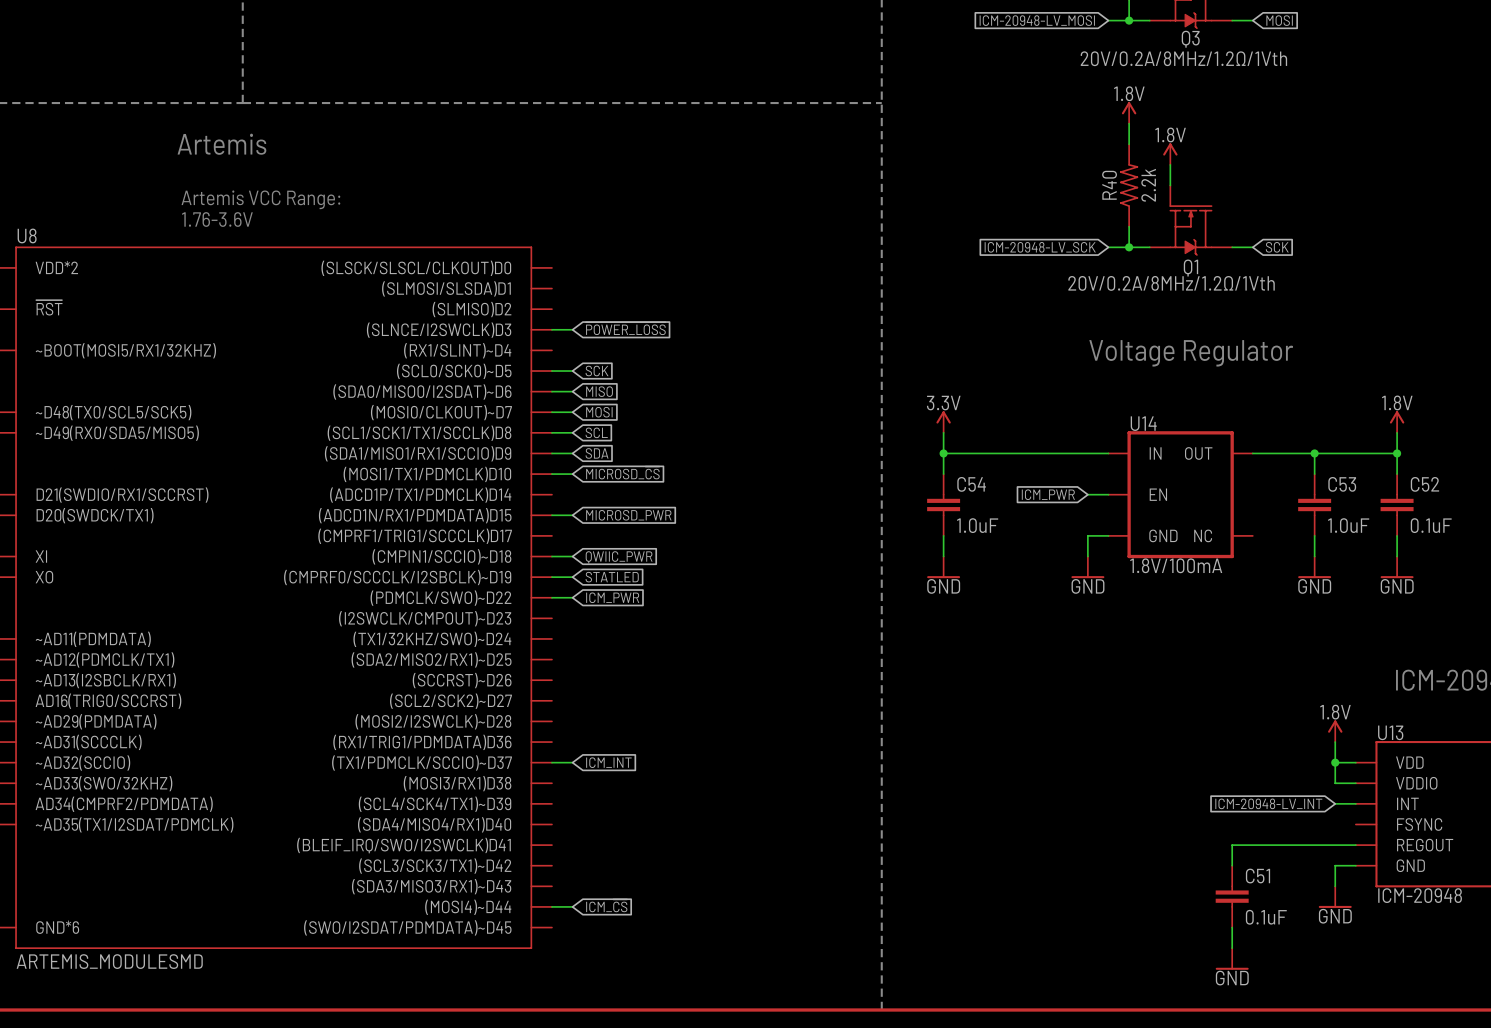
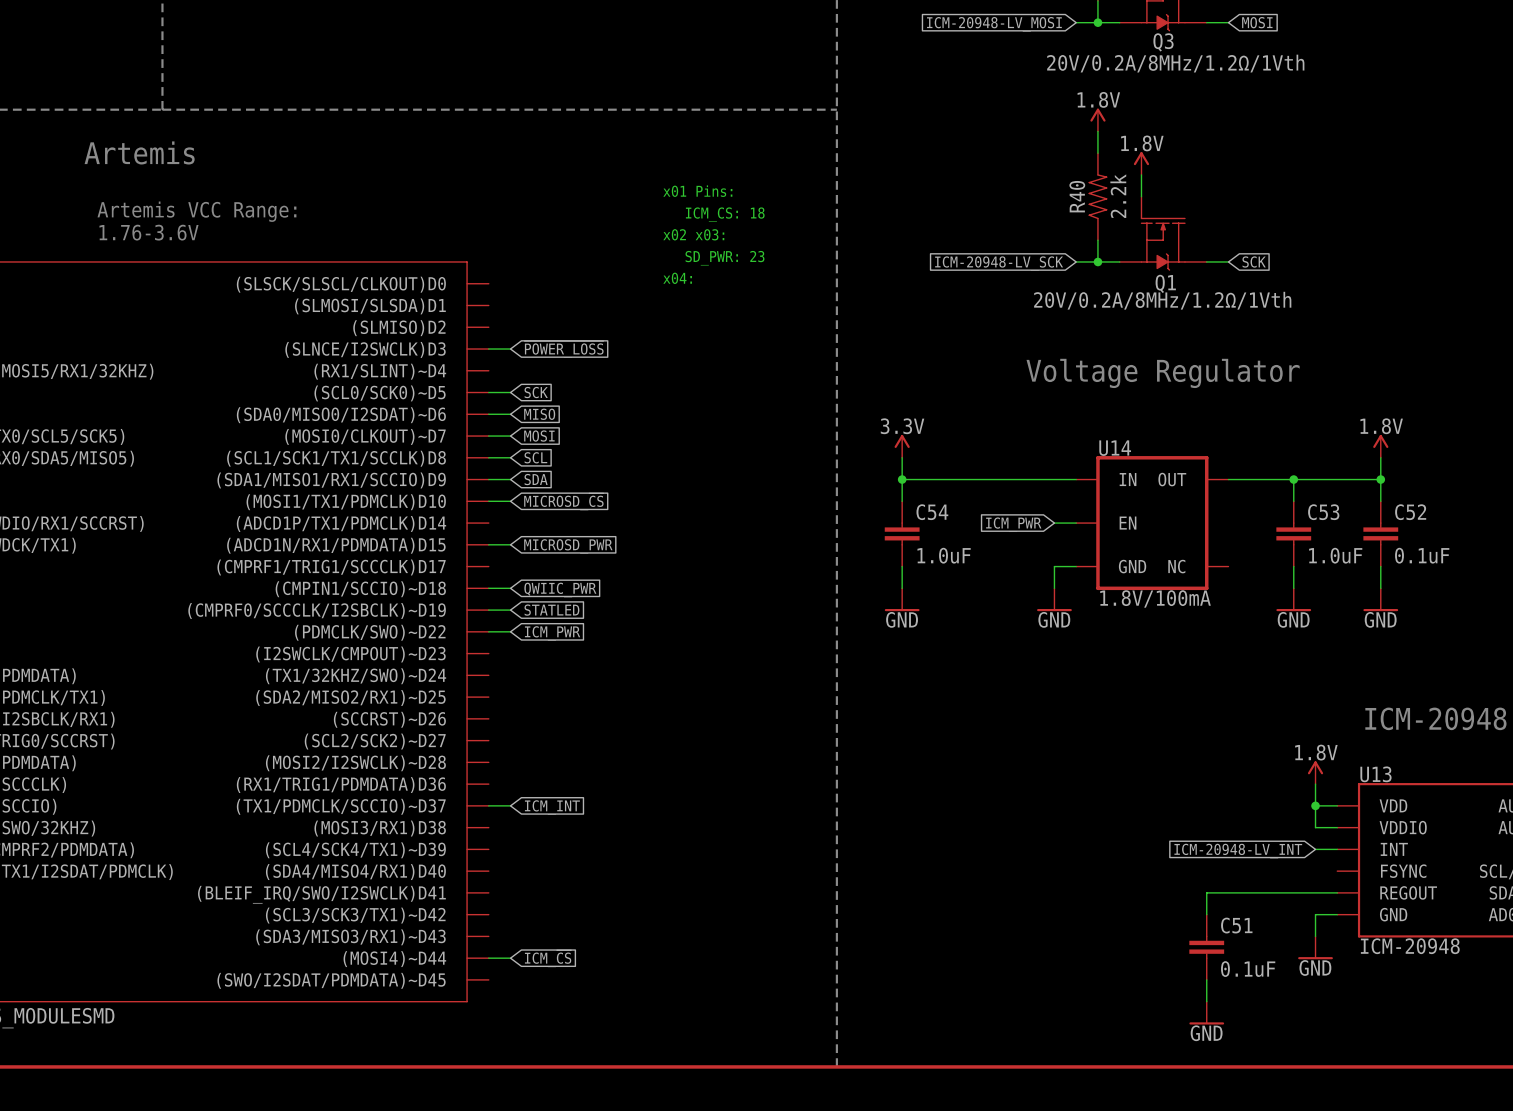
text: none -> x01 Pins: (697, 191)
text: none -> ICM_CS: 18 (725, 214)
text: none -> x02 x03: (693, 234)
text: none -> SD_PWR: 23 (724, 258)
text: none -> x04: (677, 278)

